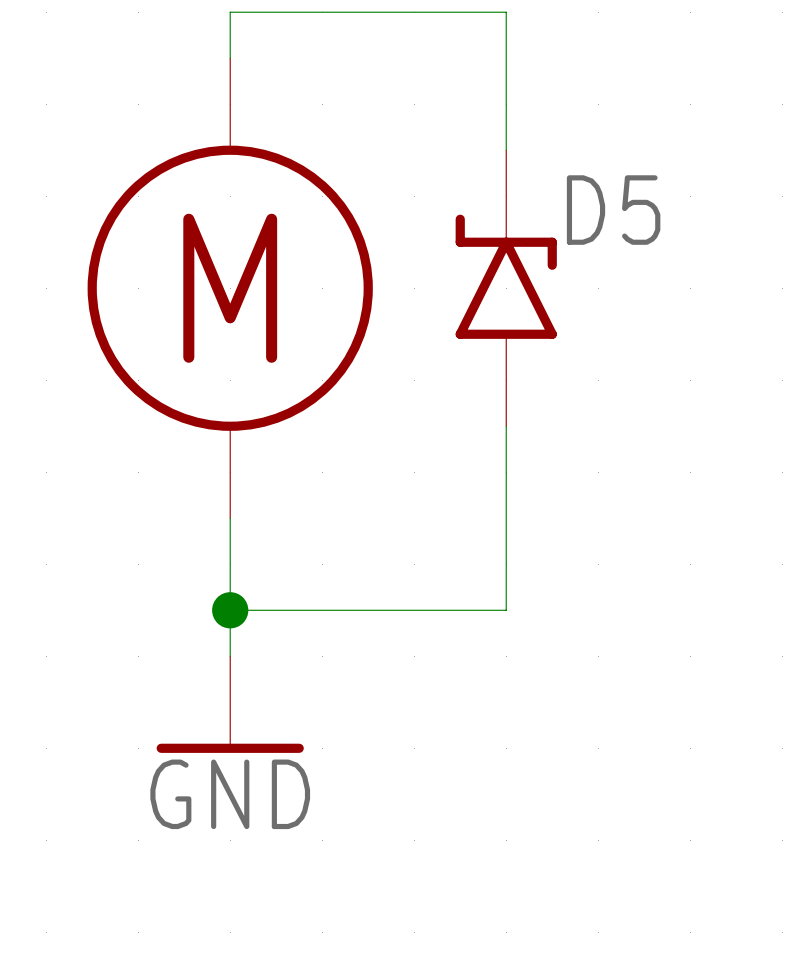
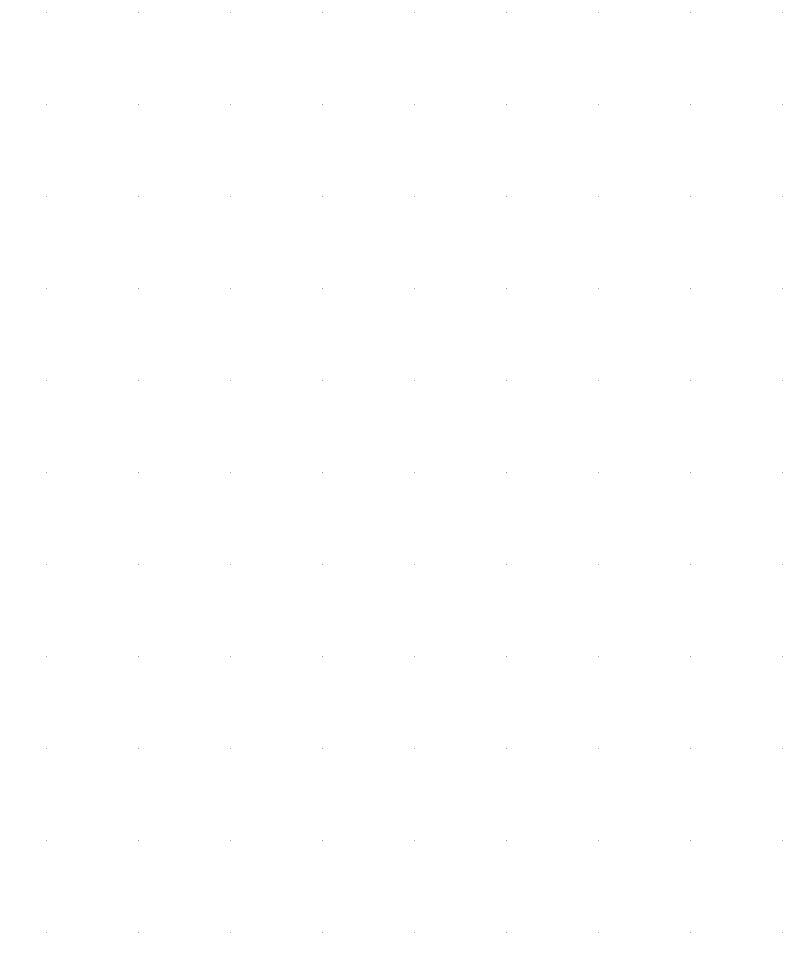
wire: (230, 58) (230, 12) (506, 12) (506, 150) -> none
part: (230, 288) -> none
D5: (506, 288) -> none
wire: (506, 426) (506, 610) (230, 610) -> none
wire: (230, 518) (230, 656) -> none
junction: (230, 610) -> none
power symbol: GND (230, 704) -> none

